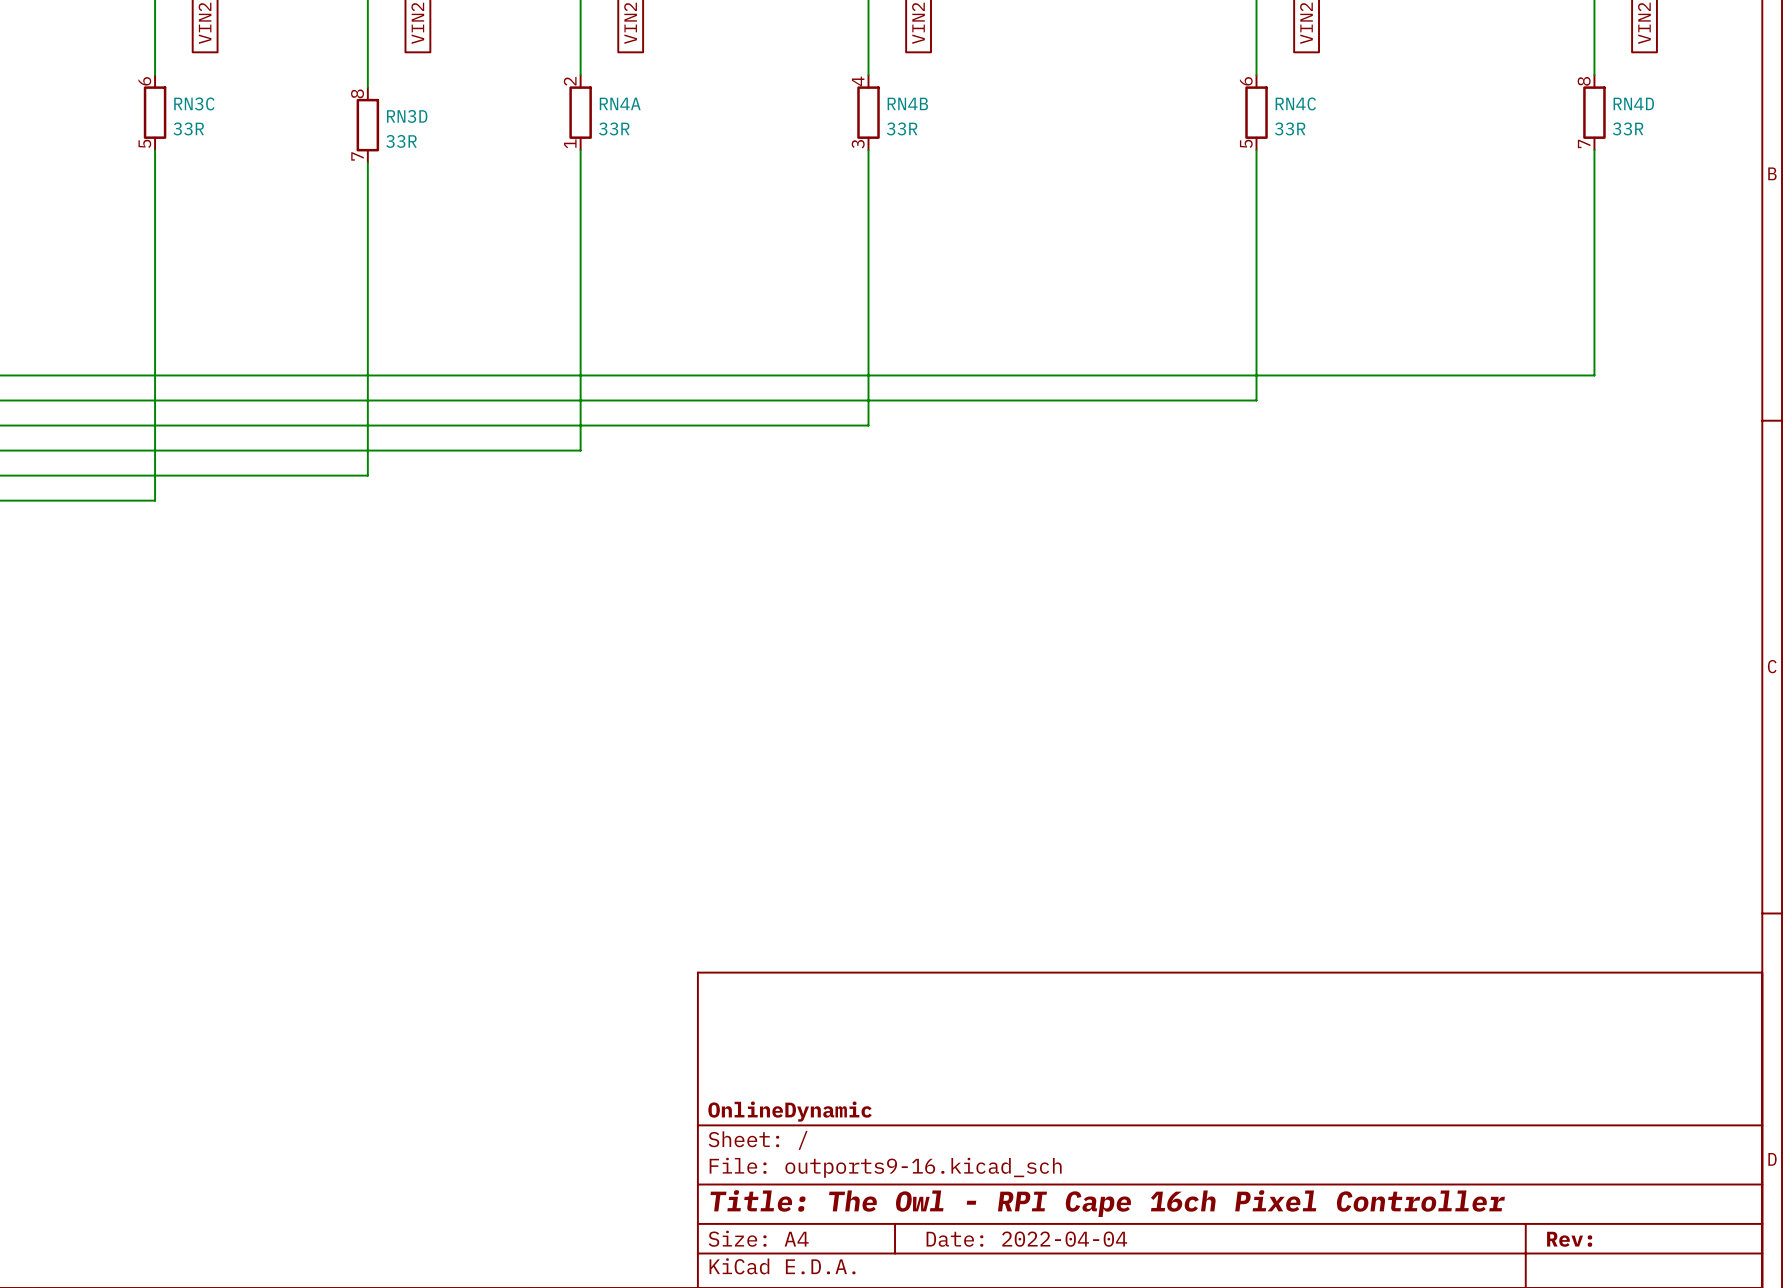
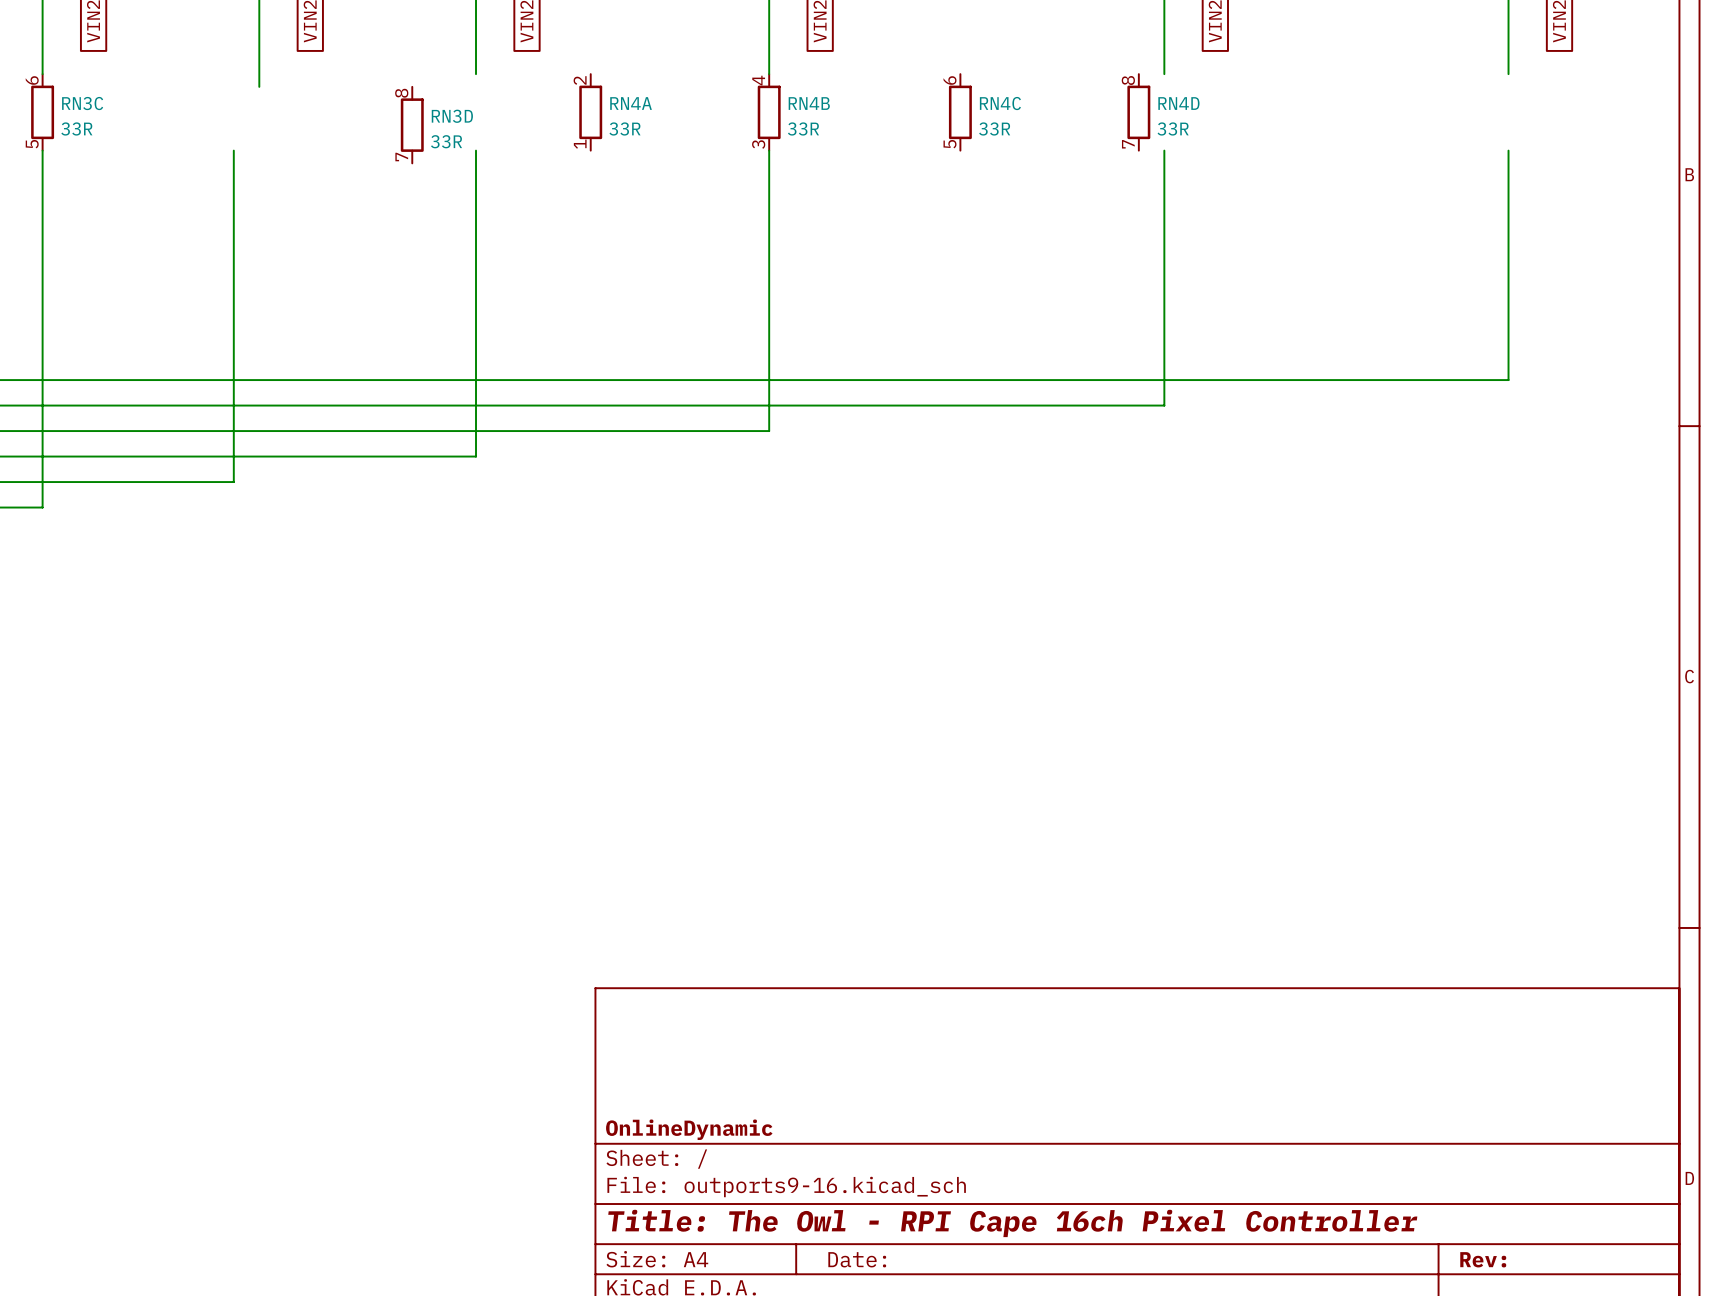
RN4A position: (580, 112) -> (590, 112)
RN4C position: (1256, 112) -> (960, 112)
RN4D position: (1594, 112) -> (1138, 112)
RN3D position: (367, 125) -> (412, 125)
wire: (367, 162) (367, 475) (342, 475) -> (233, 150) (233, 482)
title block: Date: 2022-04-04 (1026, 1239) -> Date: (857, 1259)

